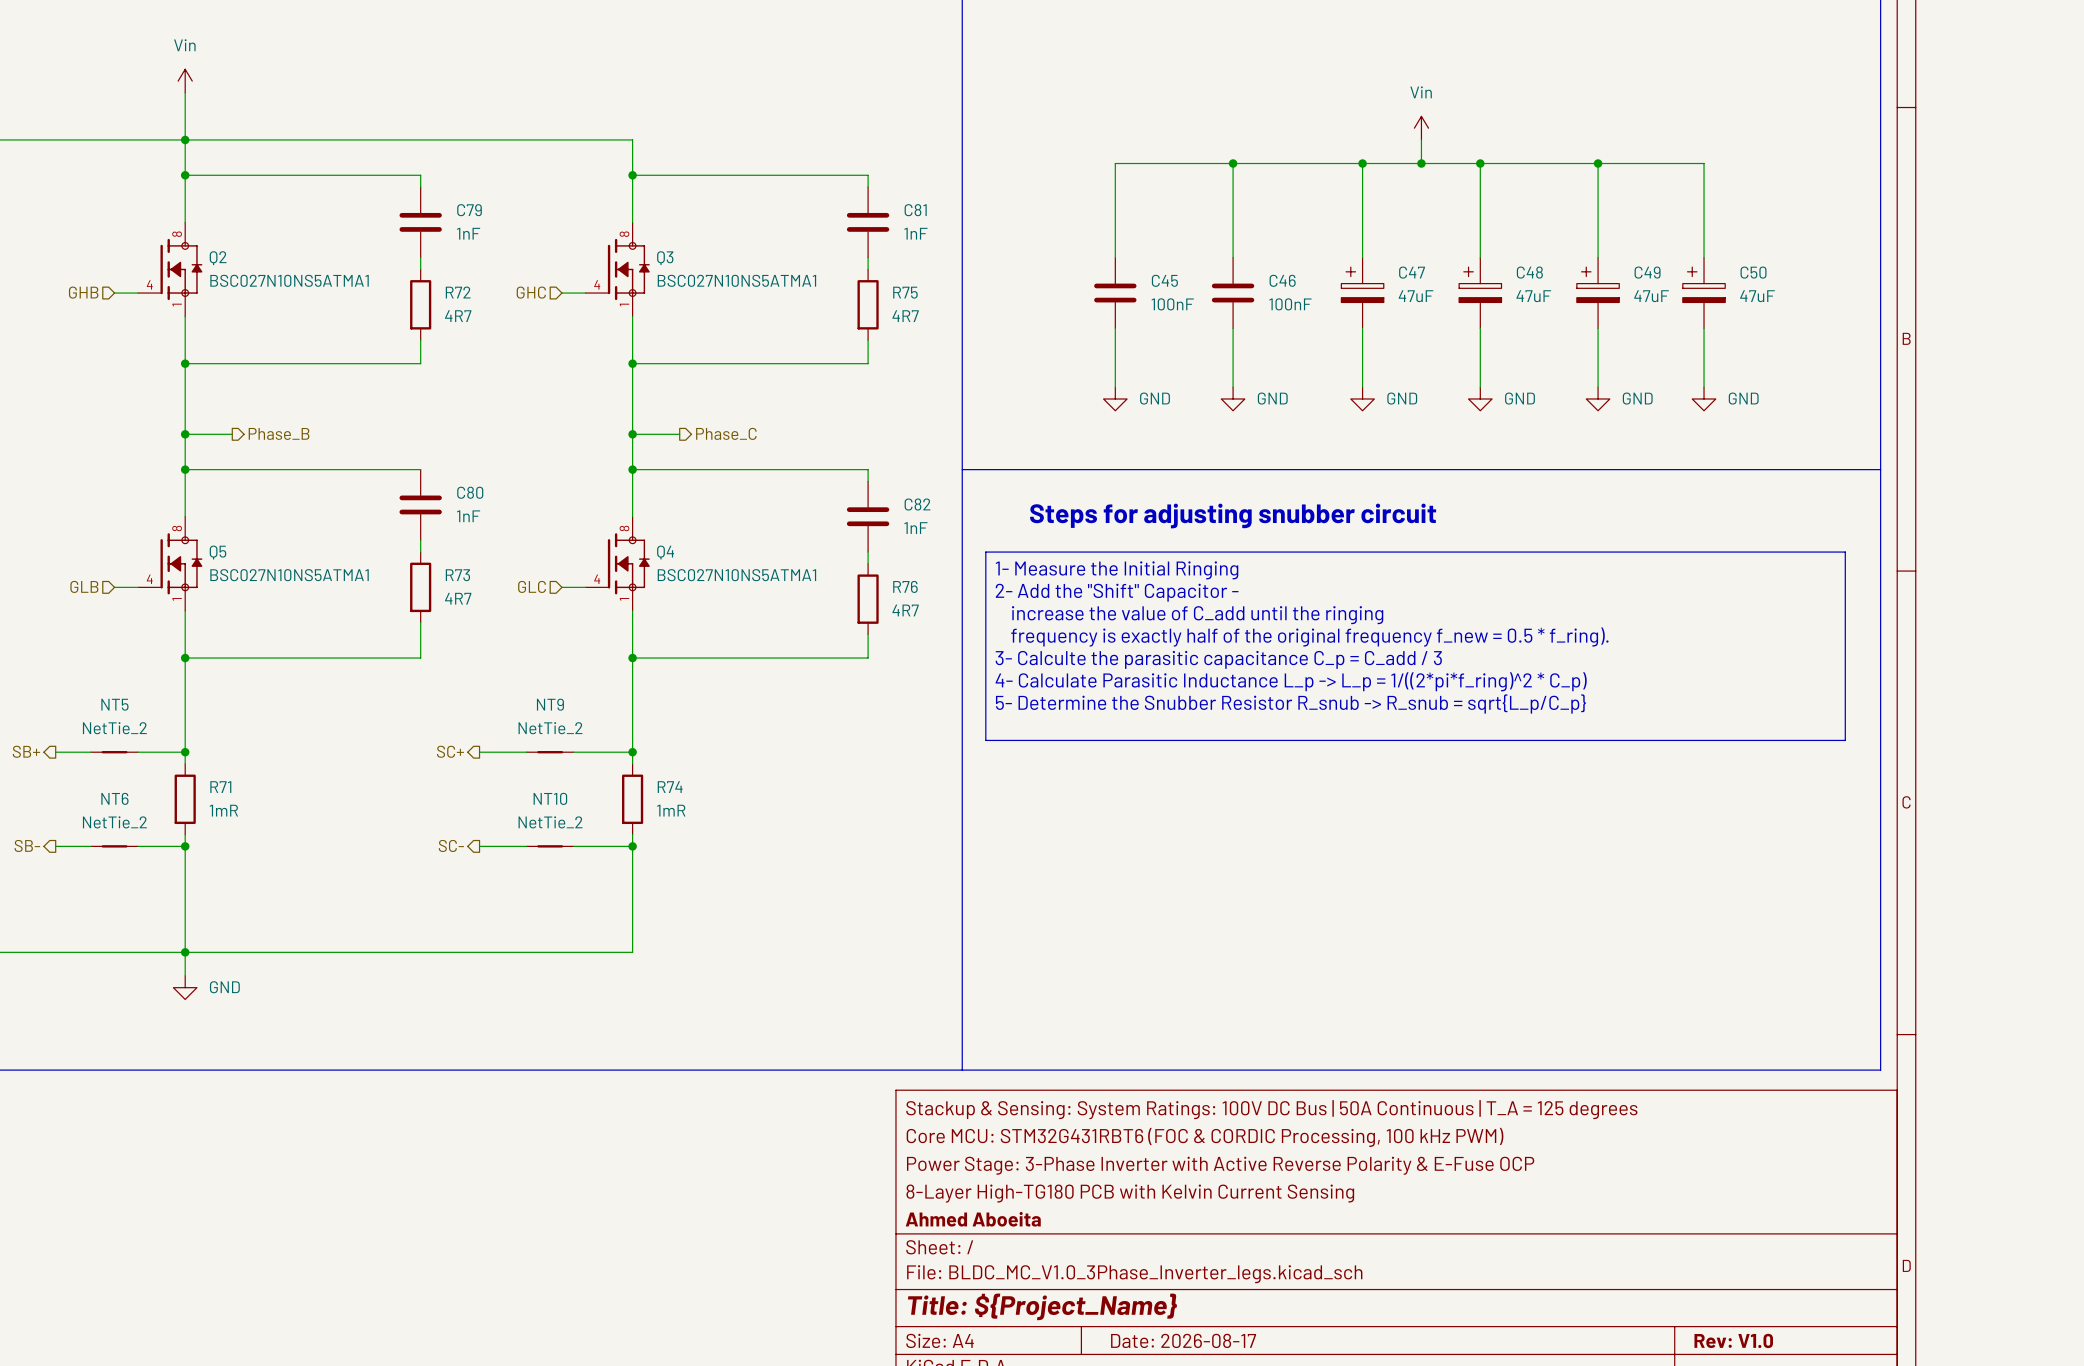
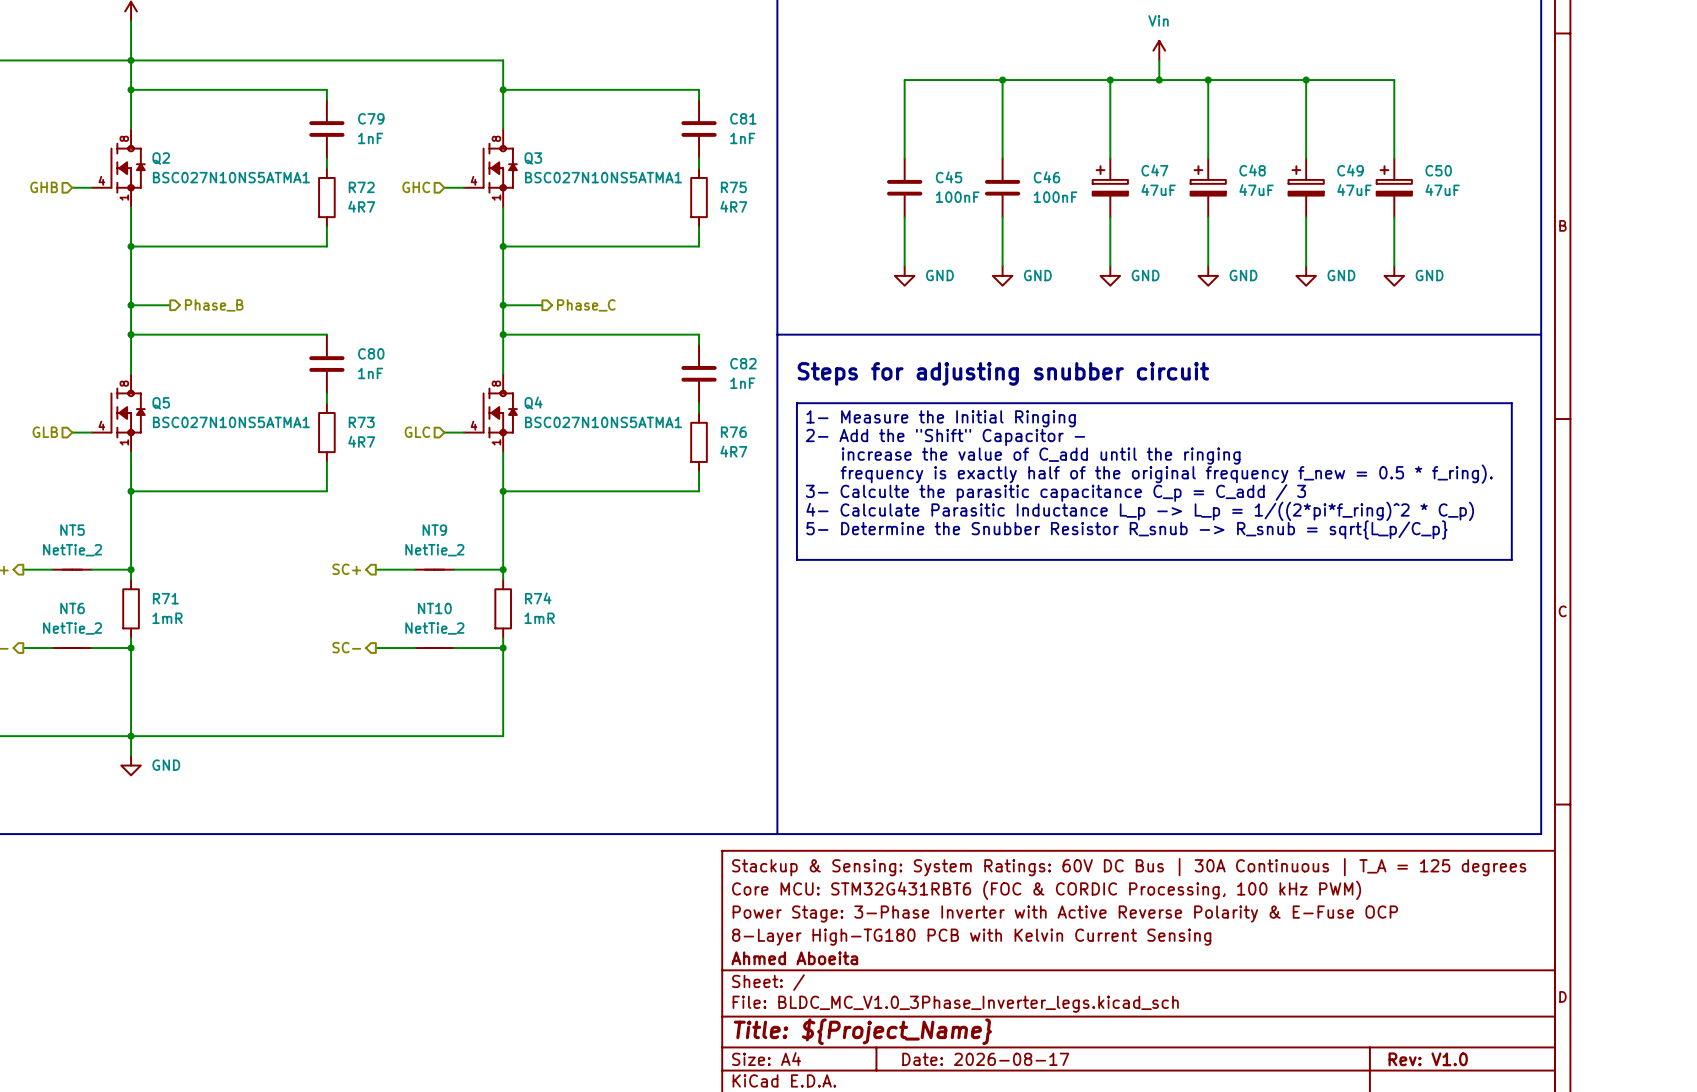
title block: Stackup & Sensing: System Ratings: 100V DC Bus | 50A Continuous | T_A = 125 degrees (1271, 1109) -> Stackup & Sensing: System Ratings: 60V DC Bus | 30A Continuous | T_A = 125 degrees (1129, 867)

